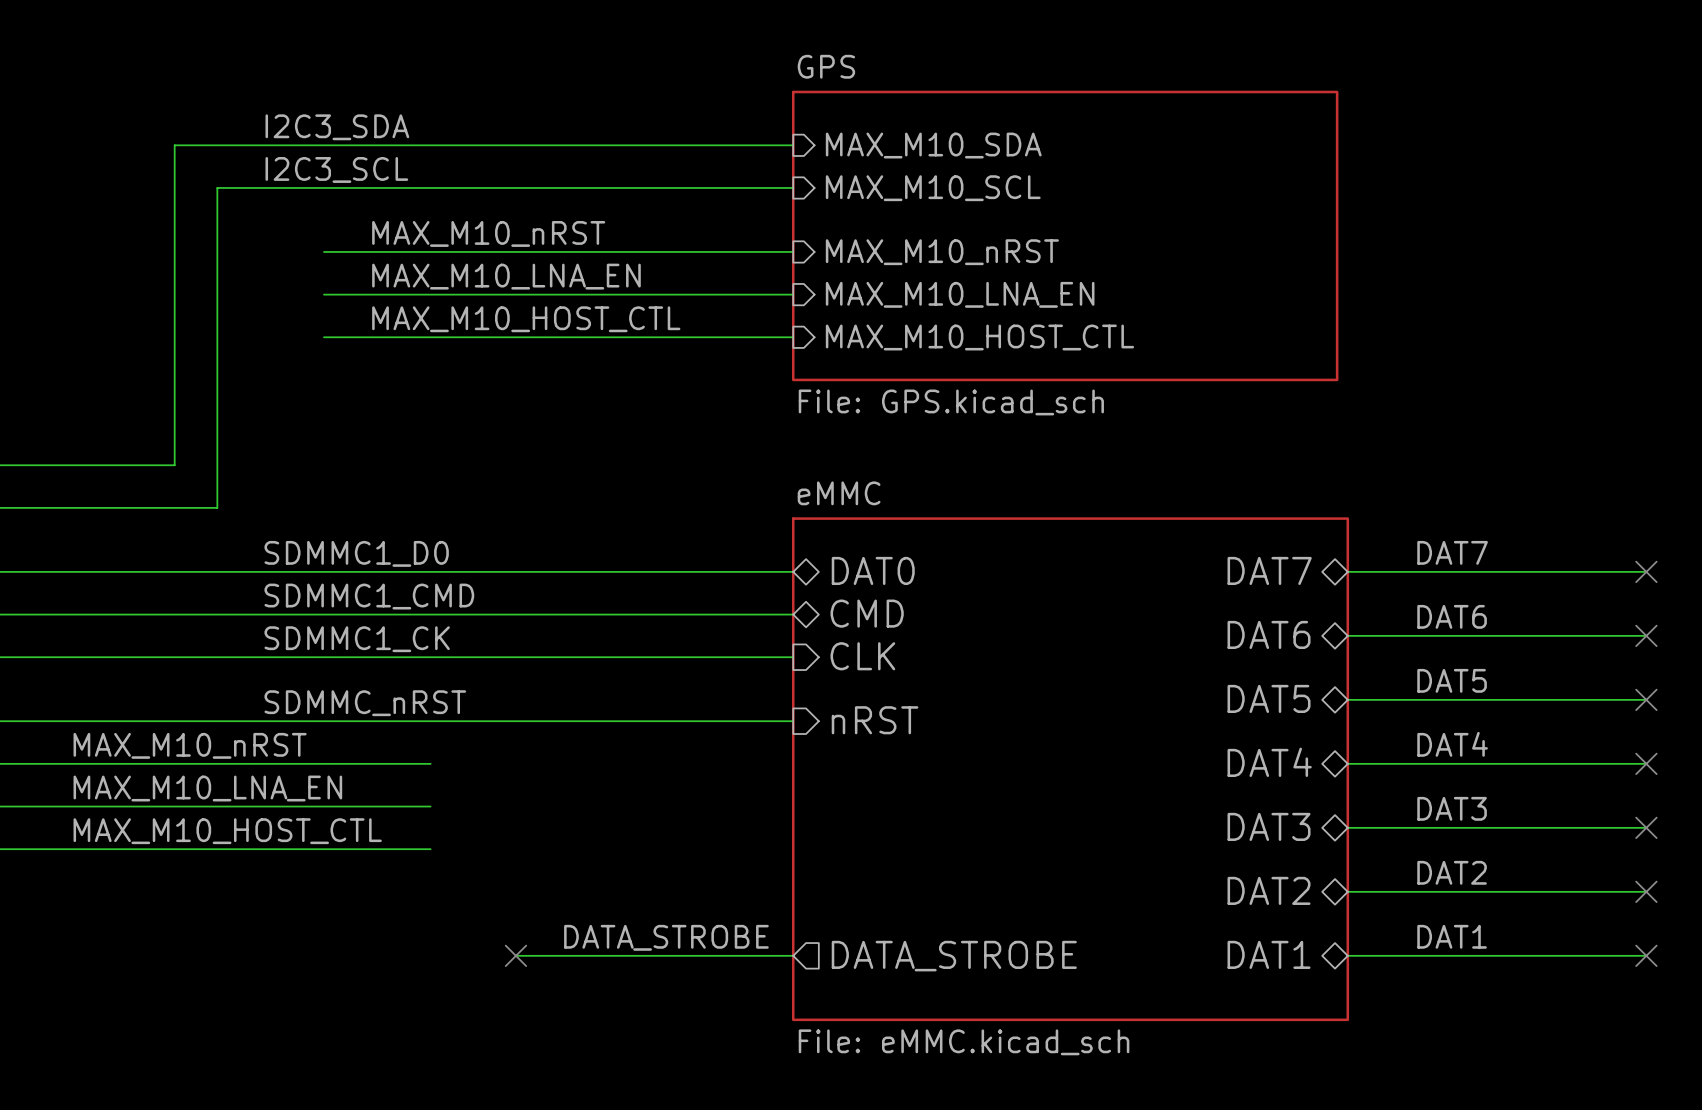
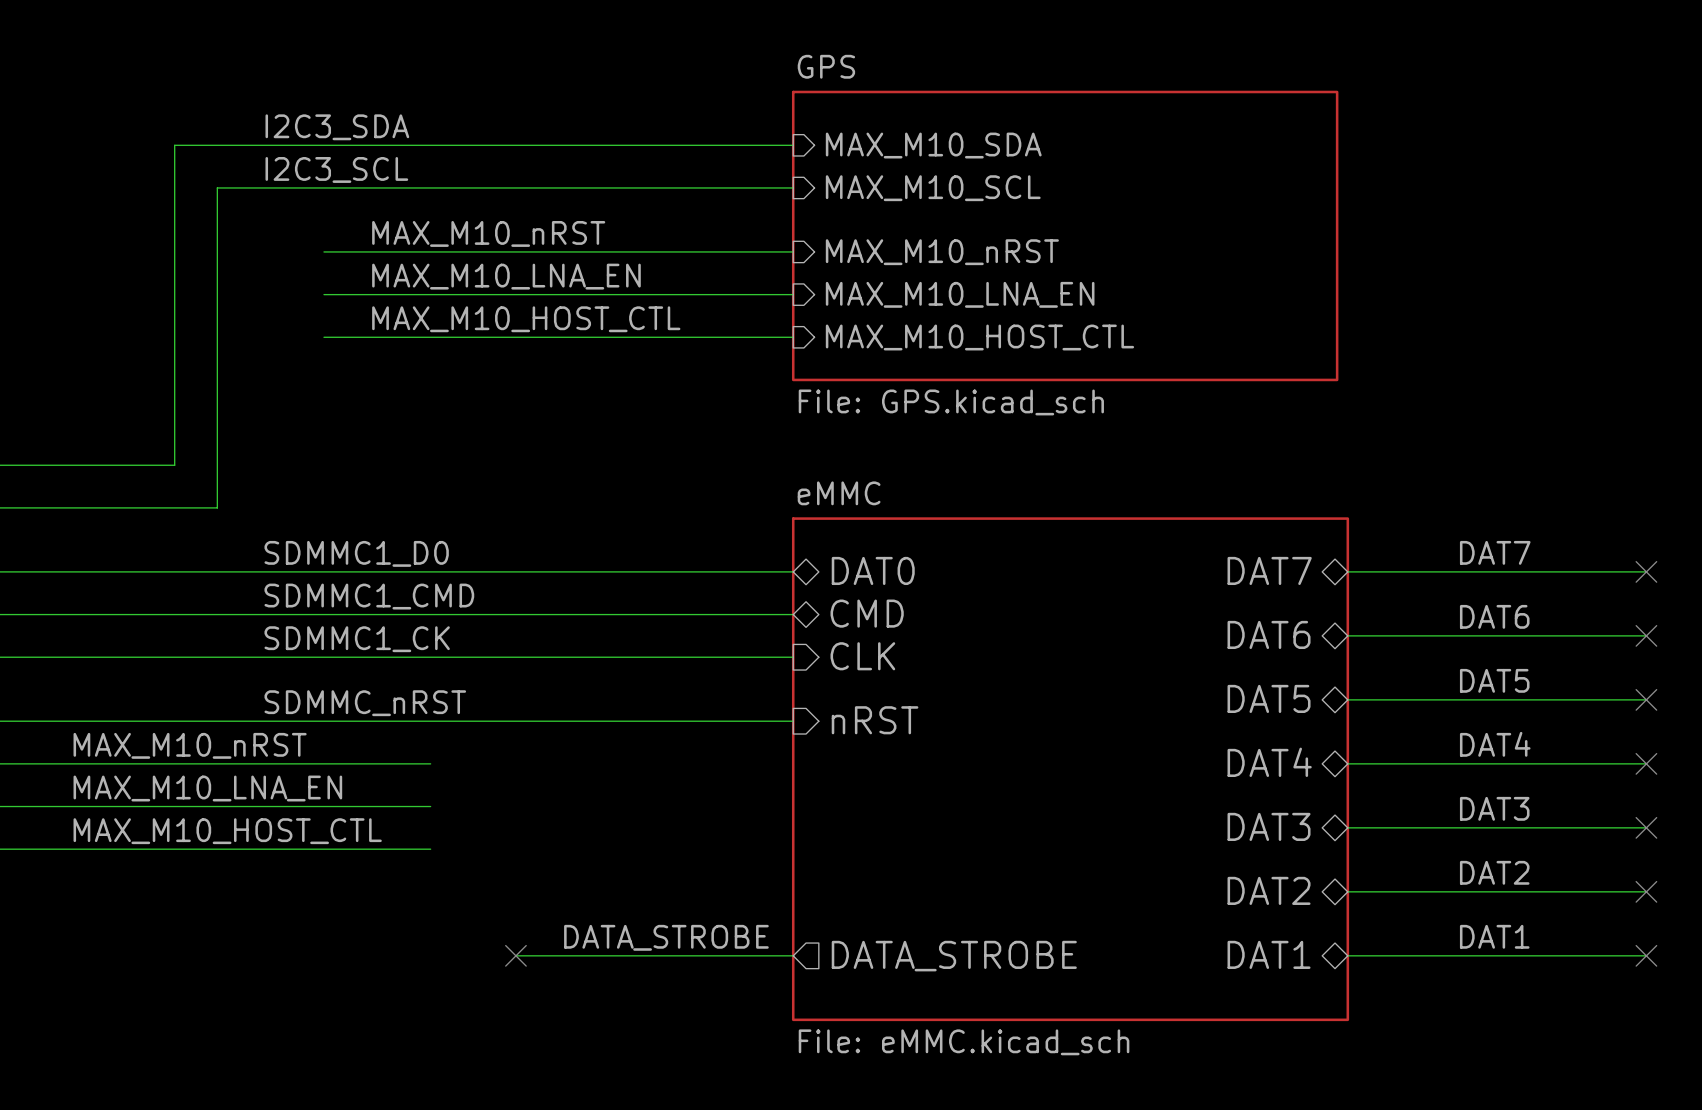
label position: DAT7 (1452, 552) -> DAT7 (1495, 552)
label position: DAT6 (1452, 616) -> DAT6 (1494, 616)
label position: DAT5 (1452, 680) -> DAT5 (1494, 680)
label position: DAT4 (1452, 744) -> DAT4 (1495, 744)
label position: DAT3 (1452, 808) -> DAT3 (1494, 808)
label position: DAT2 (1452, 872) -> DAT2 (1494, 872)
label position: DAT1 (1452, 936) -> DAT1 (1494, 936)

